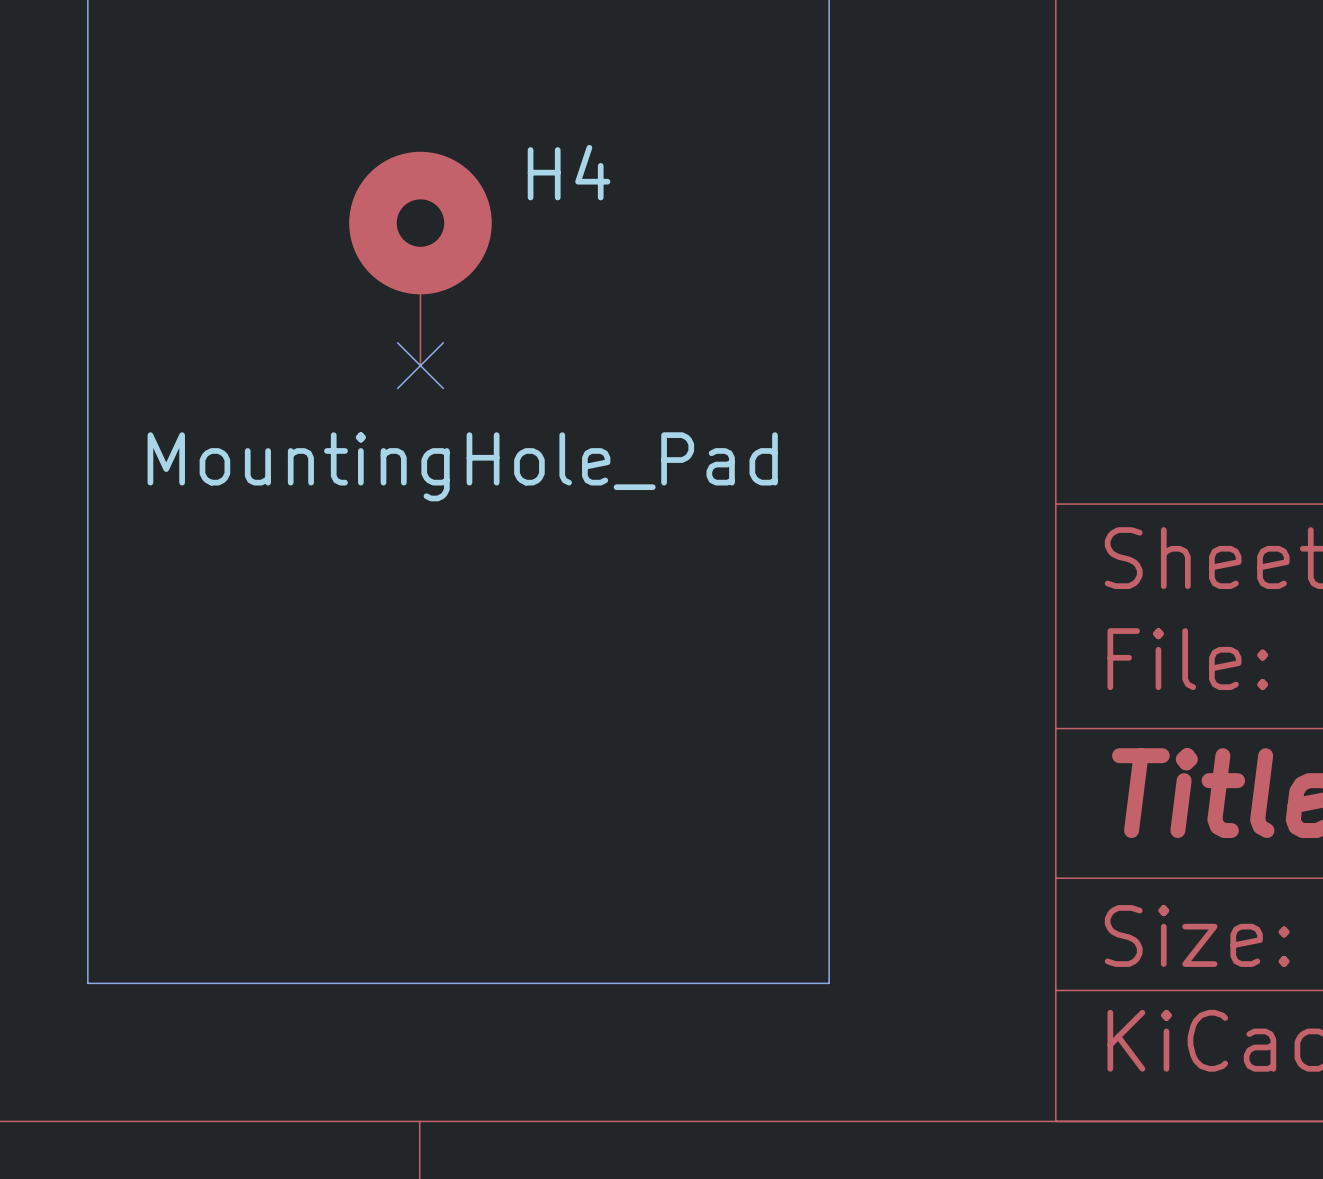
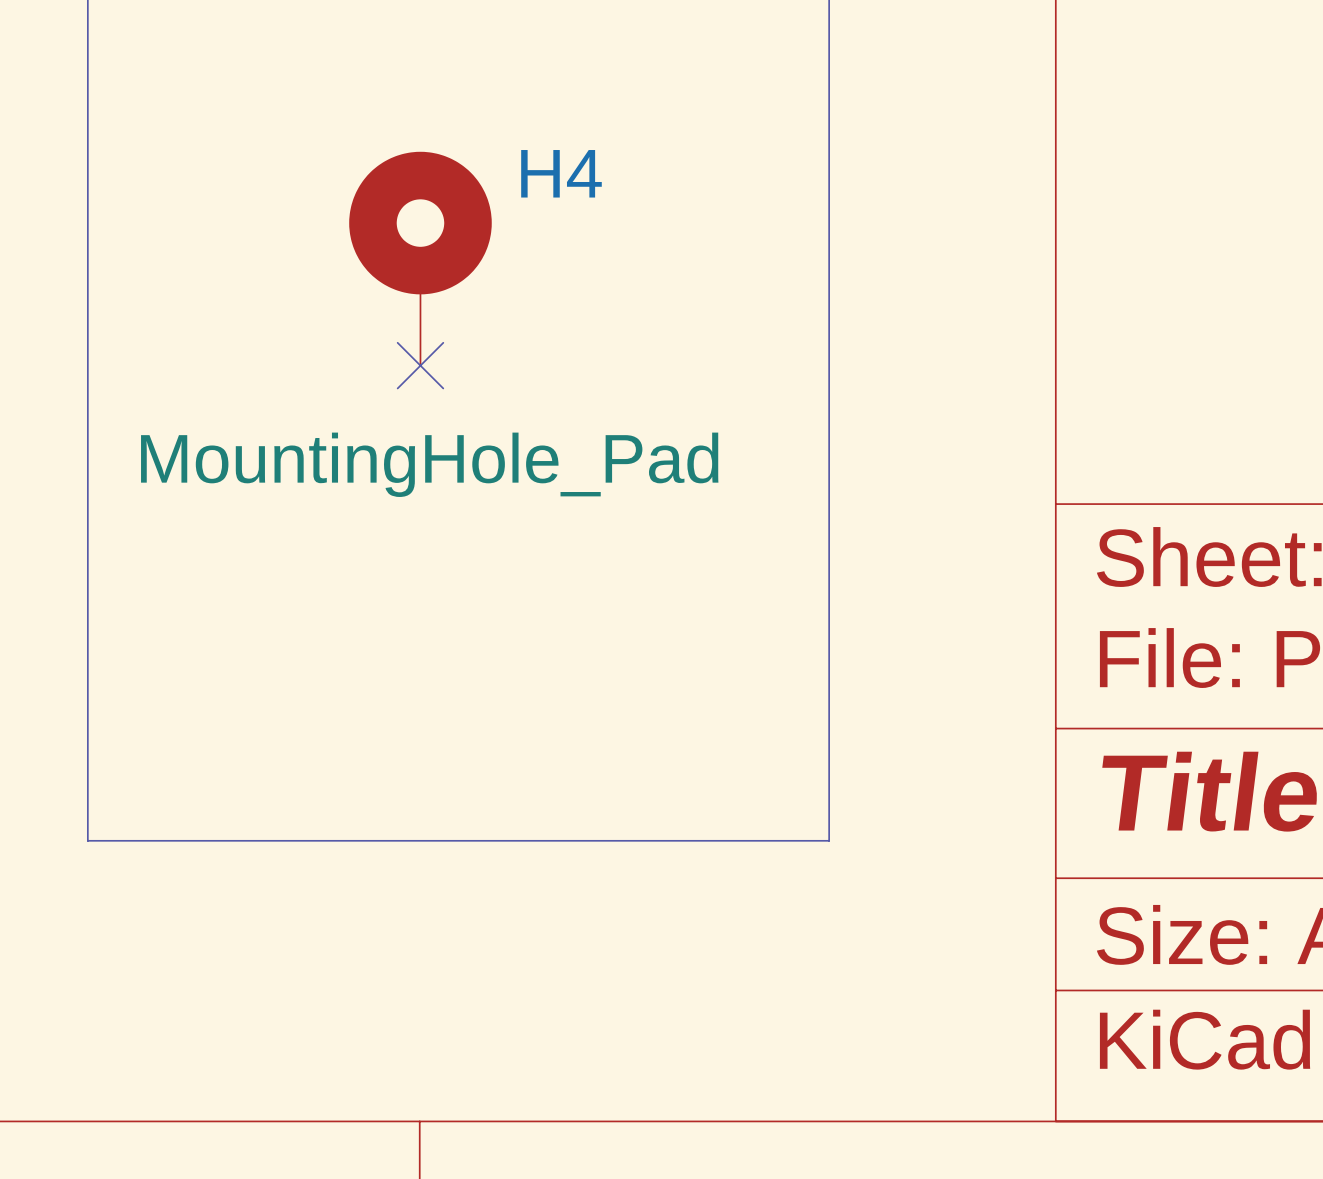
line: (87, 840) (87, 983) (829, 983) (829, 840) -> (87, 840) (829, 840)

